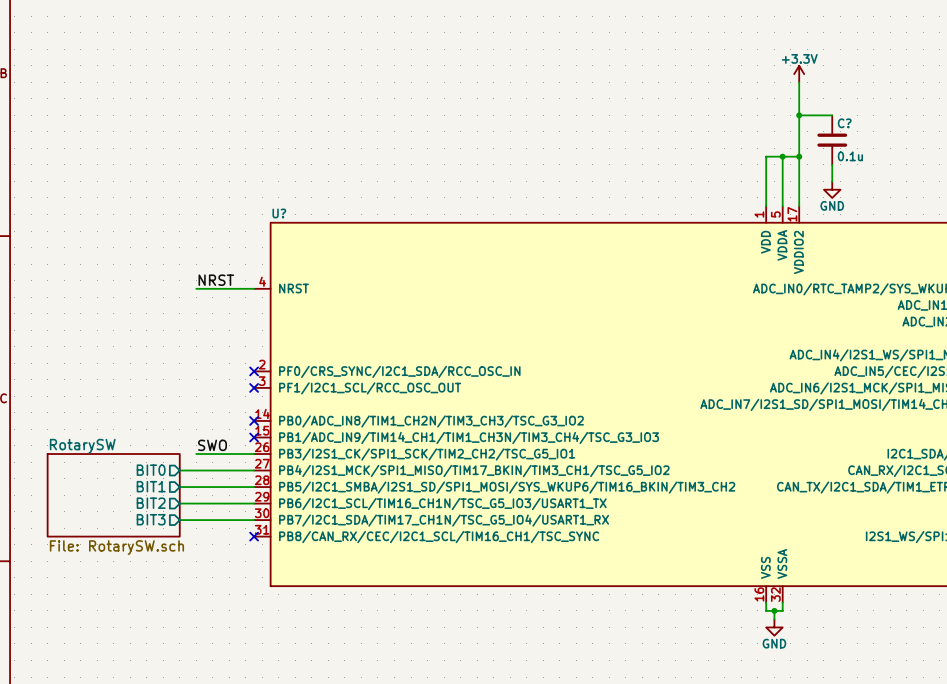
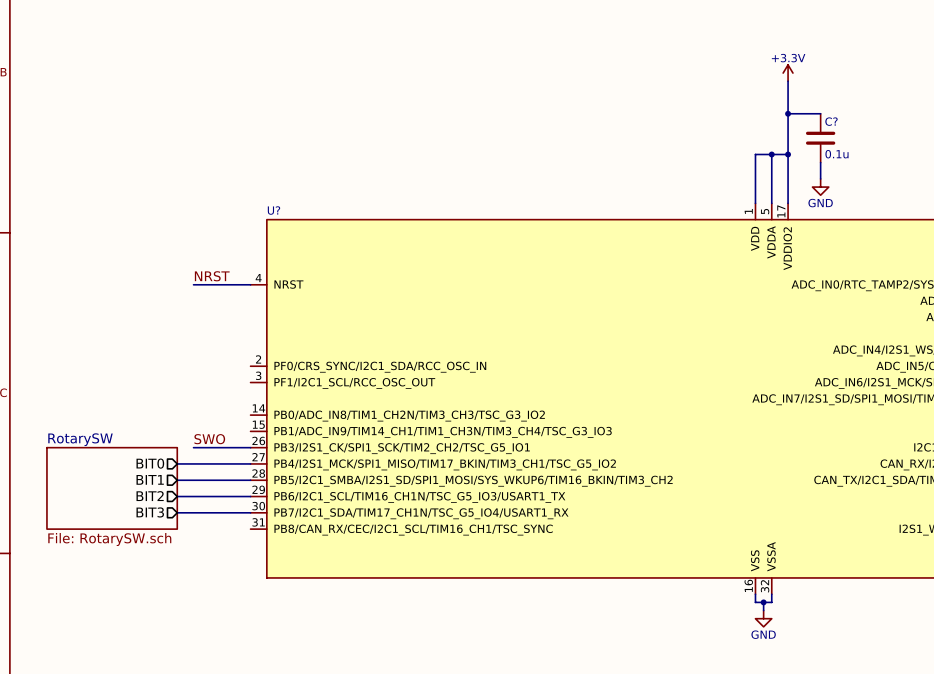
no-connect mark: (254, 371) -> none
no-connect mark: (254, 387) -> none
no-connect mark: (254, 420) -> none
no-connect mark: (254, 437) -> none
no-connect mark: (254, 536) -> none

